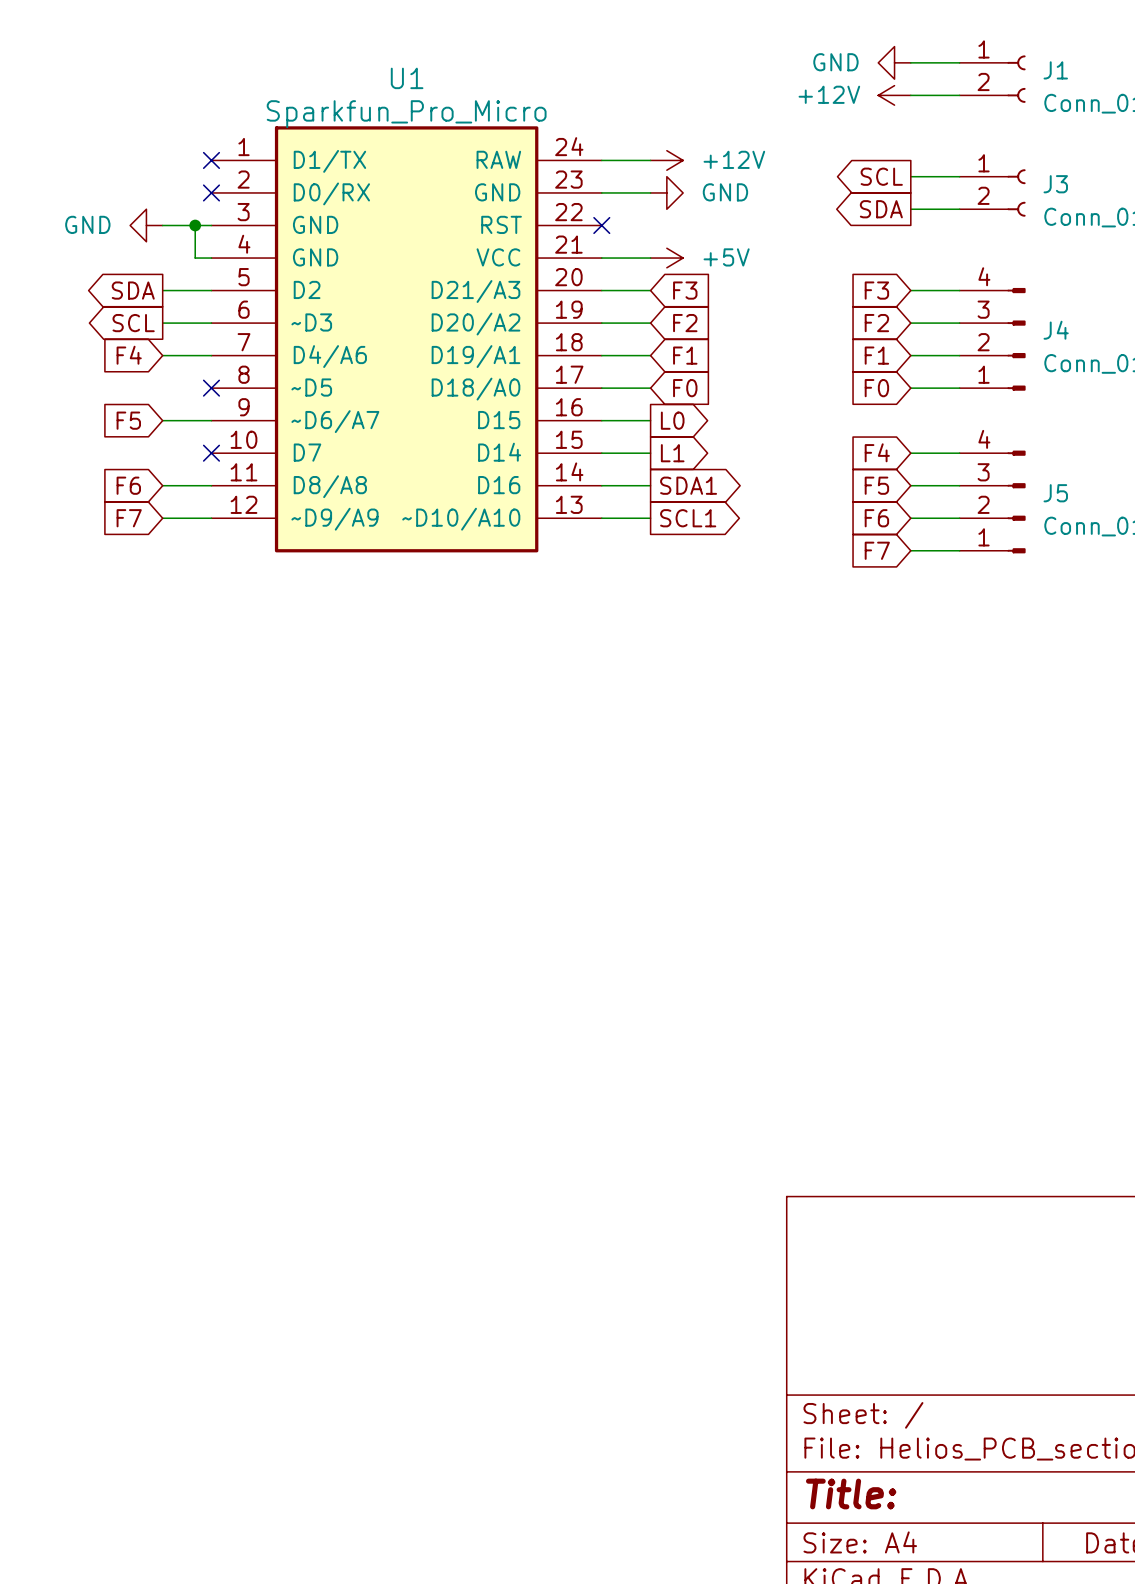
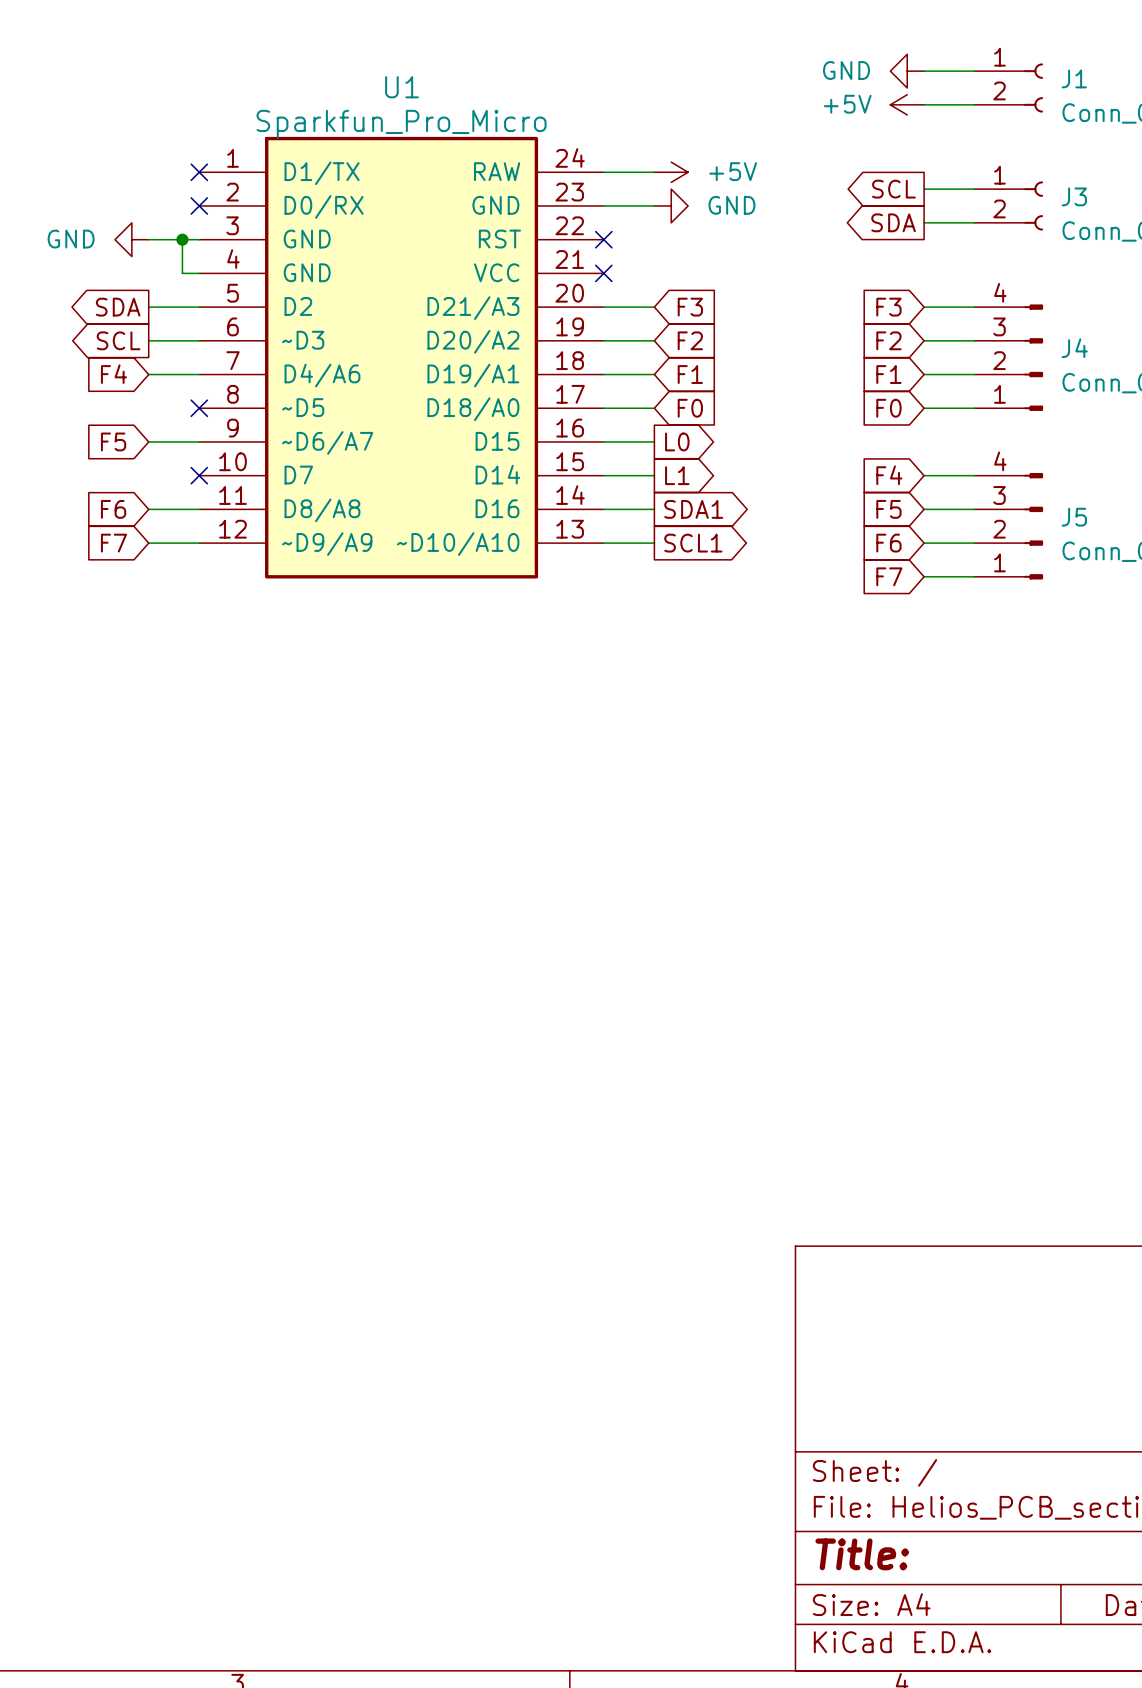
power symbol: +12V (894, 95) -> +5V (907, 104)
power symbol: +12V (666, 160) -> +5V (671, 172)
wire: (601, 258) (650, 258) -> none
no-connect mark: none -> (603, 273)
power symbol: +5V (666, 258) -> none

